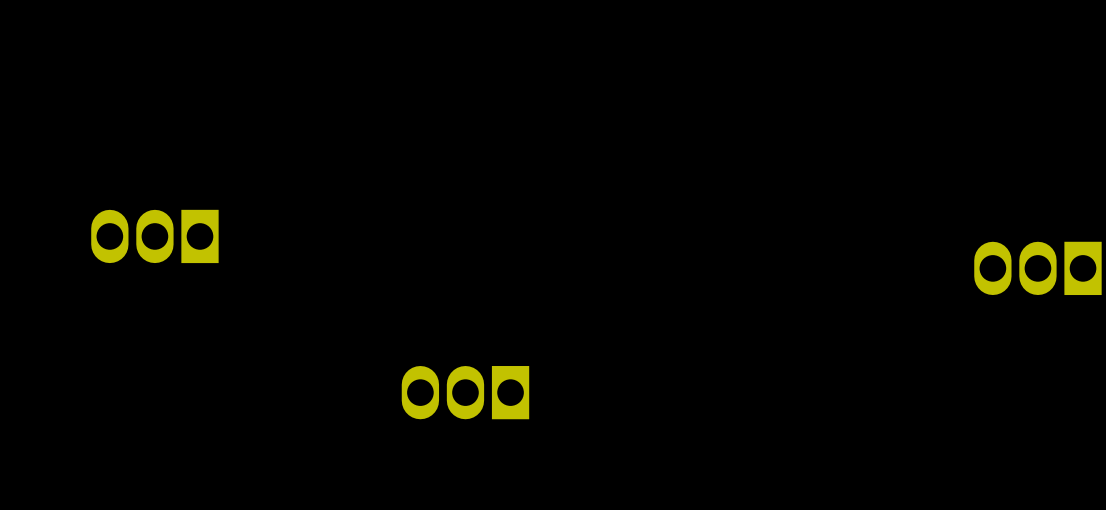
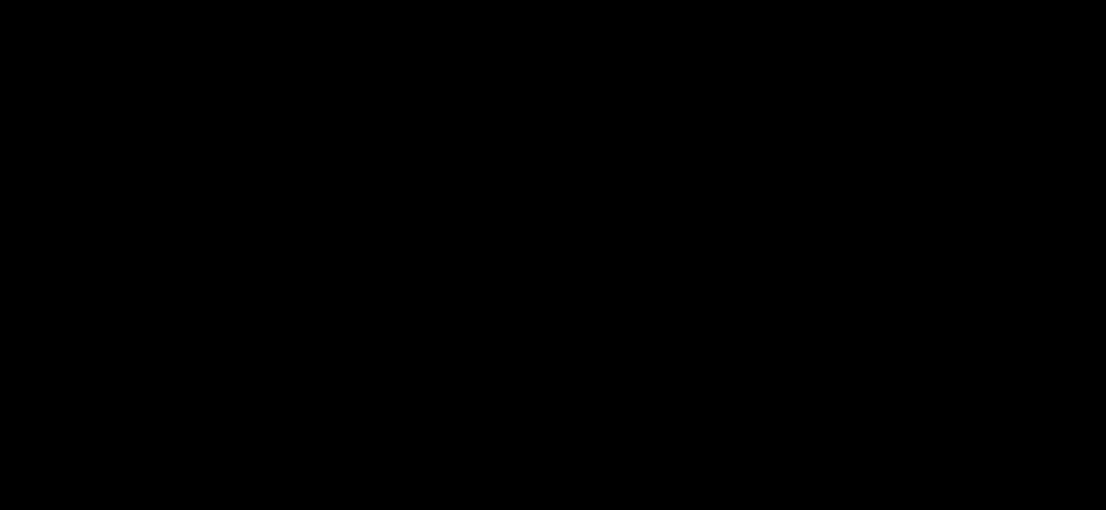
part: (154, 236) -> none
part: (1037, 268) -> none
part: (465, 392) -> none

